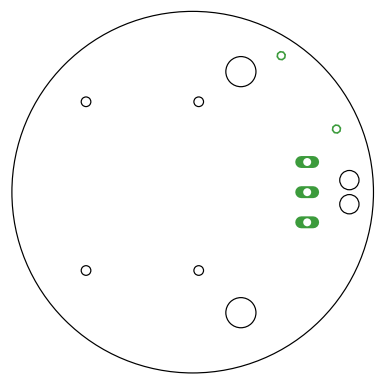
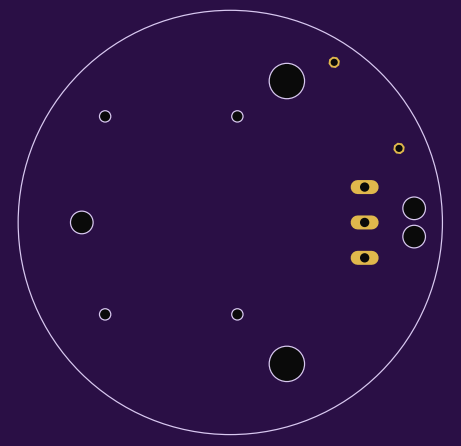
hole: none -> (81, 222)

